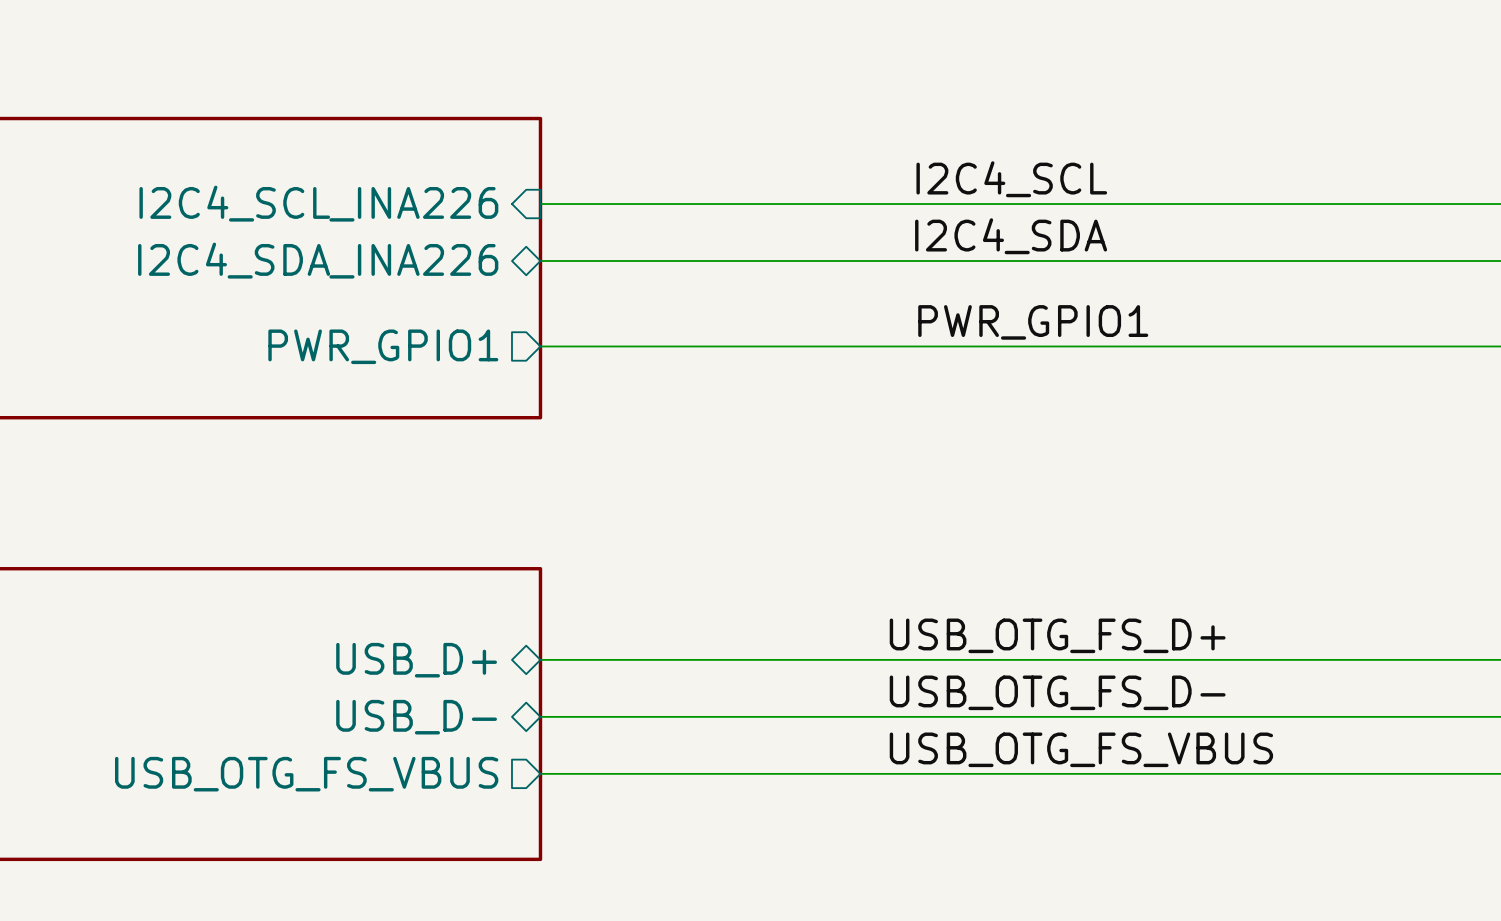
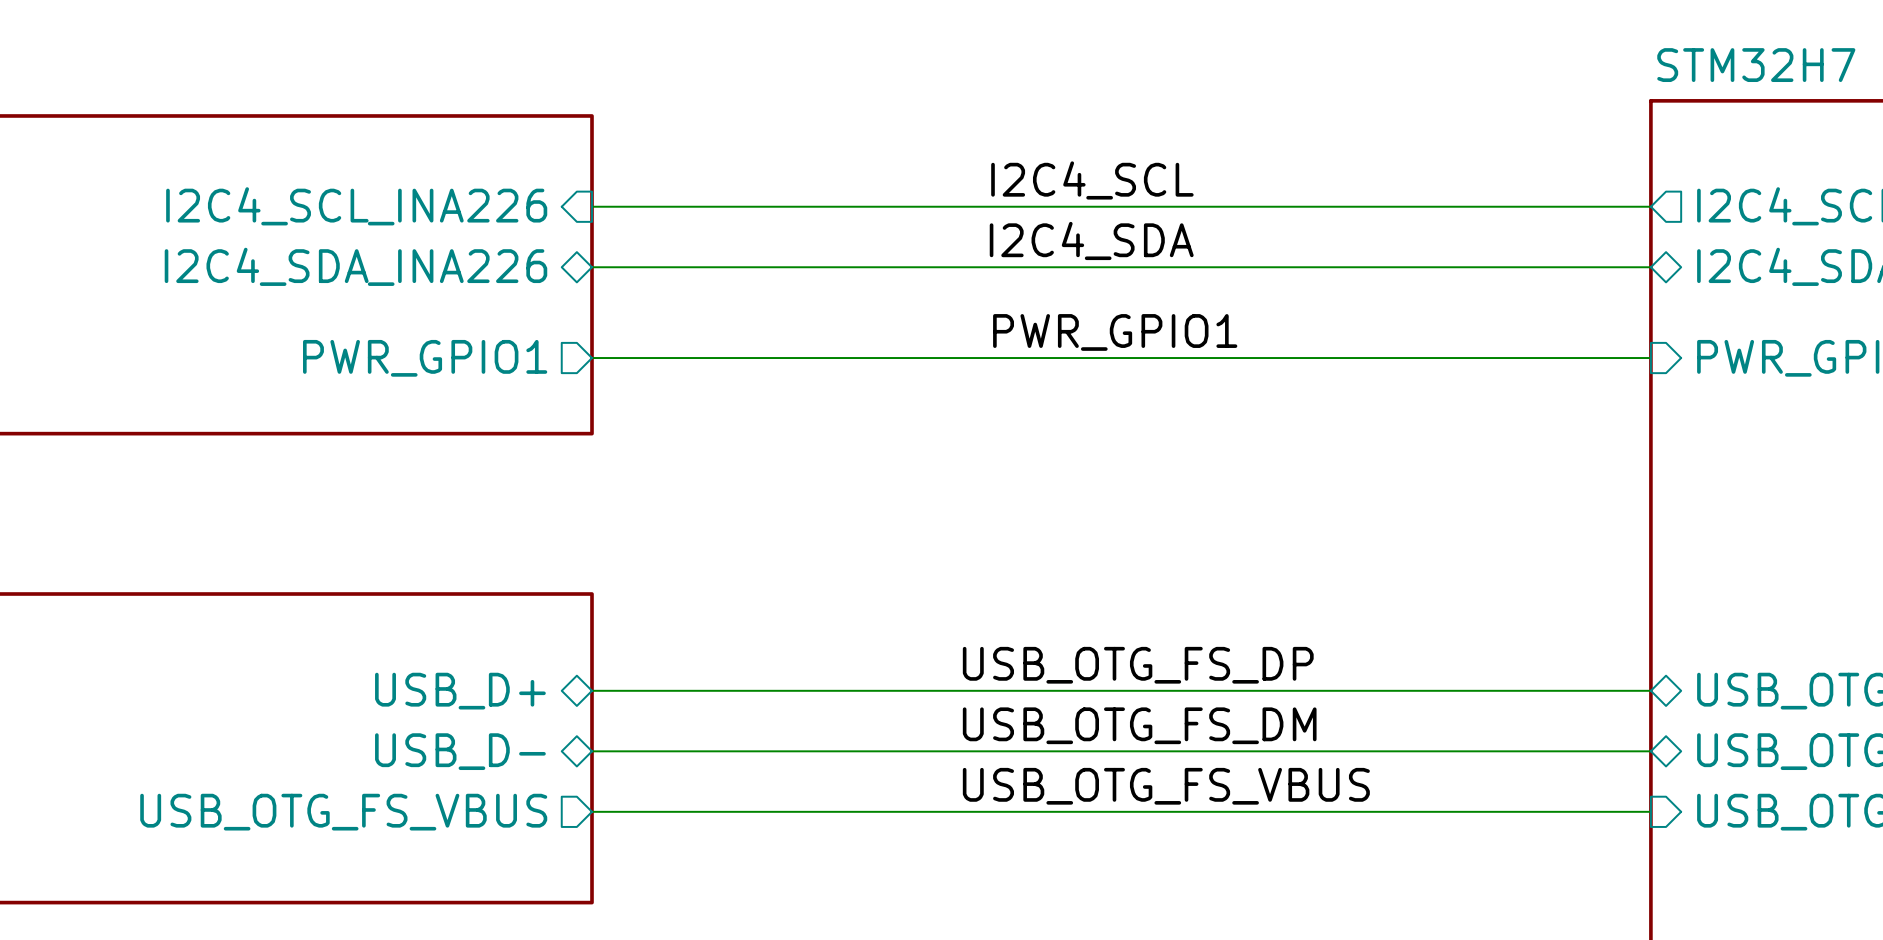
label: USB_OTG_FS_D+ (1057, 635) -> USB_OTG_FS_DP (1138, 665)
label: USB_OTG_FS_D- (1057, 692) -> USB_OTG_FS_DM (1139, 725)

